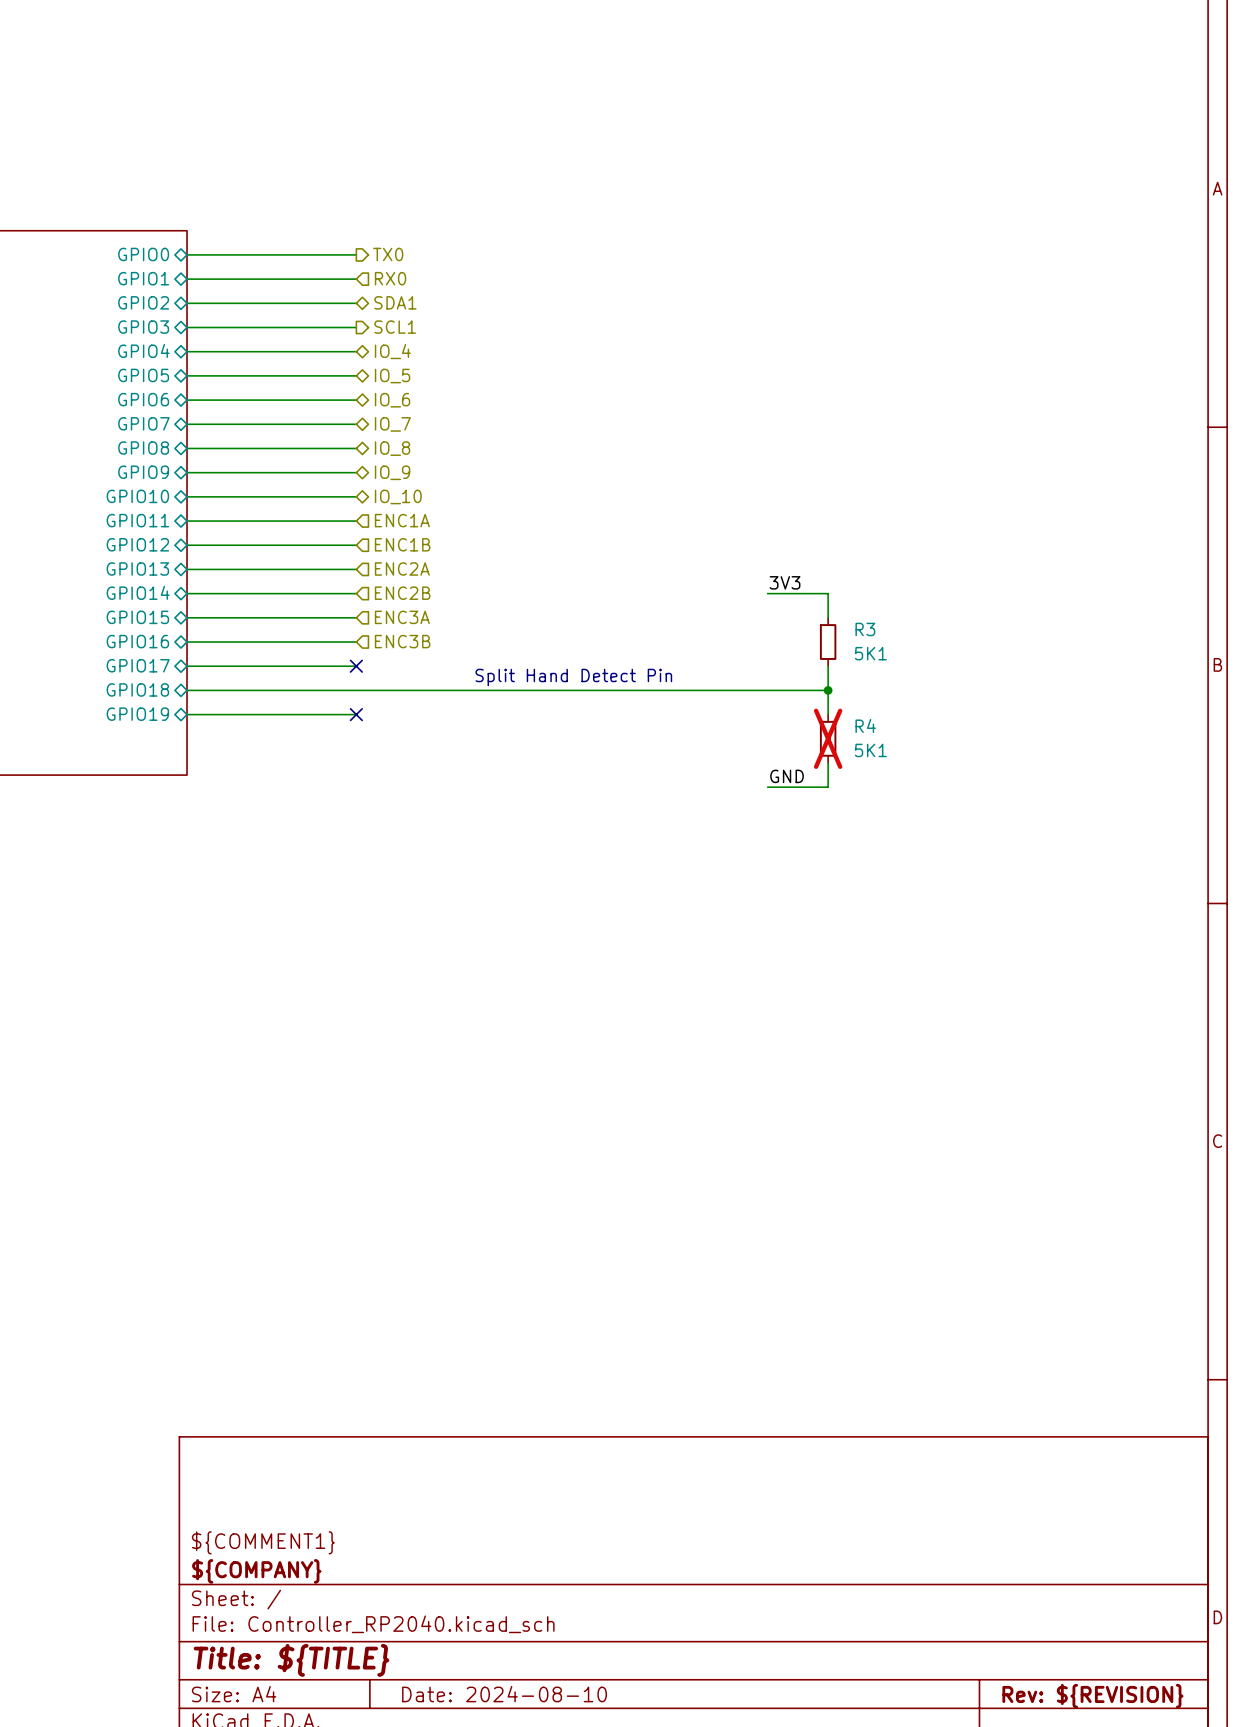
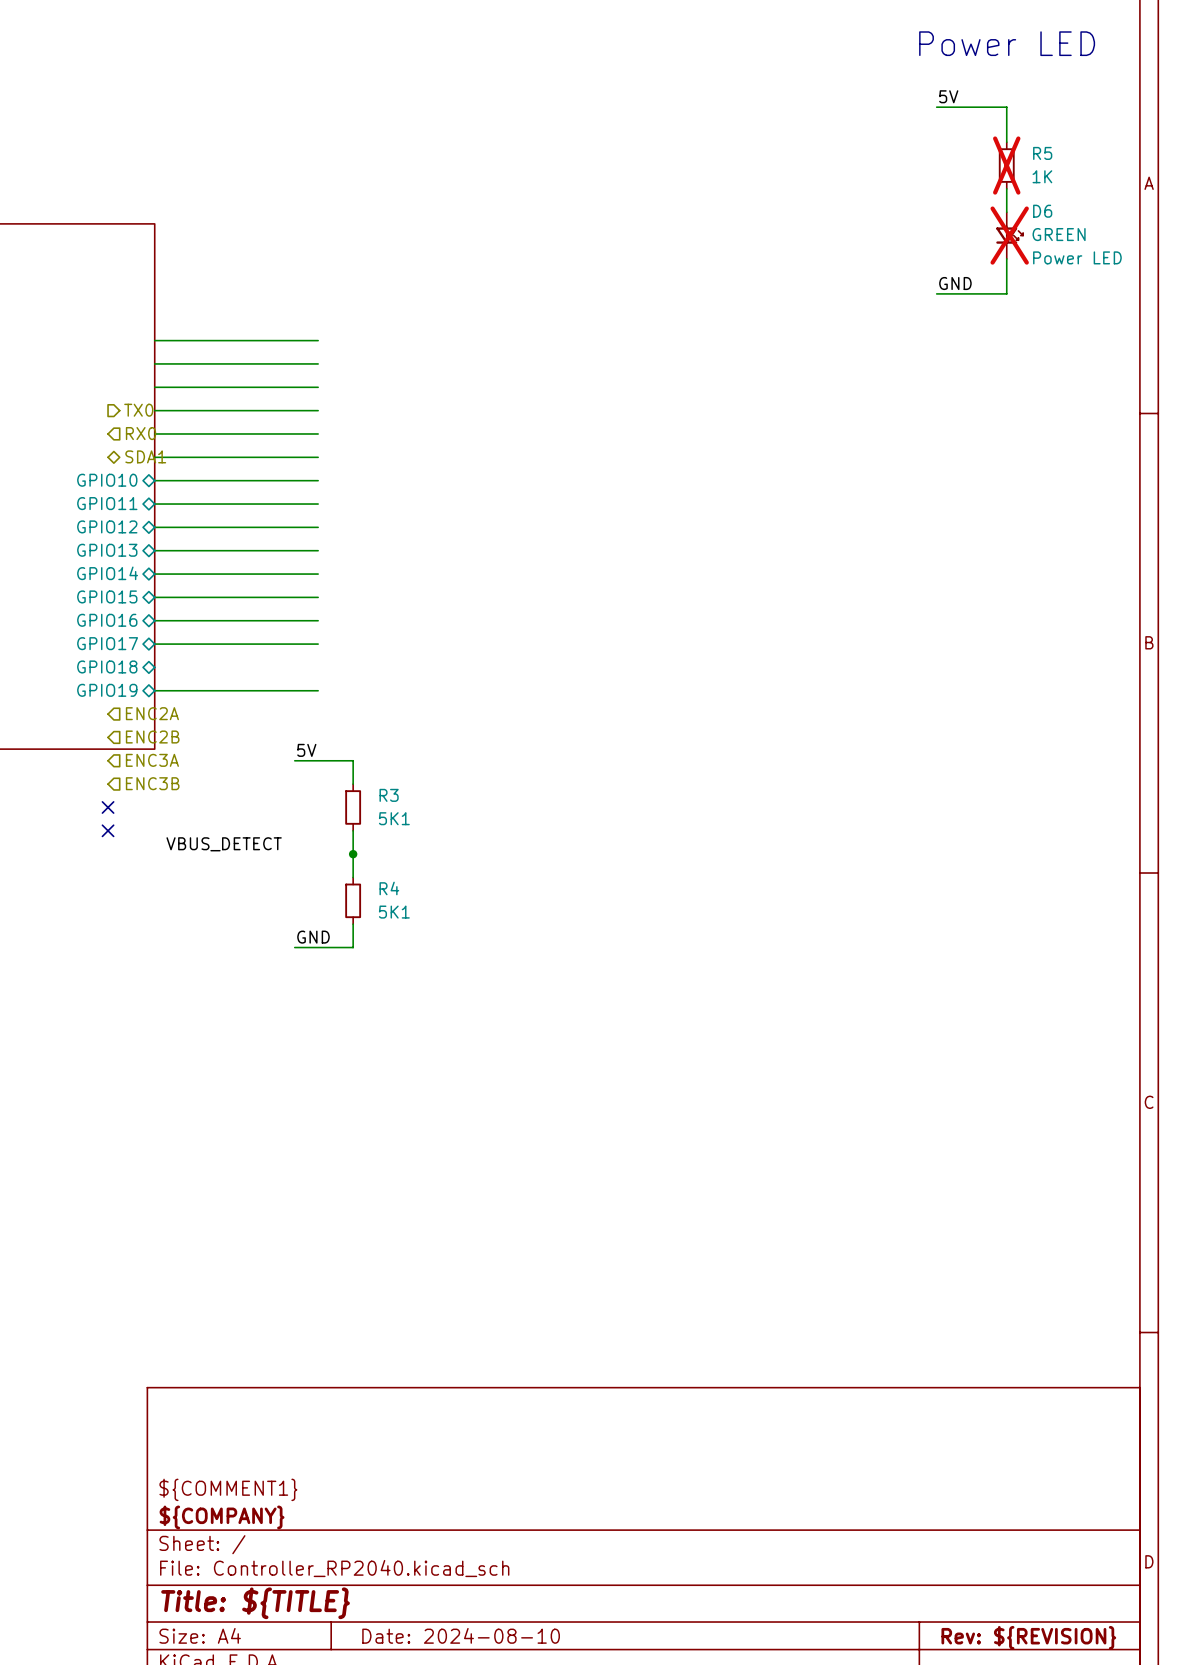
text: none -> Power LED (1007, 43)
label: none -> 5V (948, 96)
wire: none -> (936, 107) (1006, 107) (1006, 142)
R5: none -> 1K (1006, 165)
wire: none -> (1006, 188) (1006, 212)
D6: none -> GREEN (1009, 235)
sheet pin: GPIO0 (143, 254) -> none
wire: (187, 254) (356, 254) -> none
hierarchical label: TX0 (388, 254) -> none
wire: none -> (1006, 258) (1006, 293) (936, 293)
sheet pin: GPIO1 (143, 278) -> none
hierarchical label: RX0 (390, 278) -> none
wire: (187, 279) (356, 279) -> none
label: none -> GND (955, 283)
sheet pin: GPIO2 (143, 302) -> none
hierarchical label: SDA1 (395, 302) -> none
wire: (187, 303) (356, 303) -> none
sheet pin: GPIO3 (143, 327) -> none
wire: (187, 327) (356, 327) -> none
hierarchical label: SCL1 (395, 327) -> none
sheet pin: GPIO4 (143, 350) -> none
hierarchical label: IO_4 (392, 351) -> none
sheet pin: GPIO5 (143, 375) -> none
hierarchical label: IO_5 (392, 376) -> none
sheet pin: GPIO6 (143, 399) -> none
hierarchical label: IO_6 (392, 400) -> none
sheet pin: GPIO7 (143, 423) -> none
hierarchical label: none -> TX0 (138, 410)
hierarchical label: IO_7 (392, 424) -> none
sheet pin: GPIO8 (143, 448) -> none
hierarchical label: none -> RX0 (141, 433)
hierarchical label: IO_8 (392, 448) -> none
sheet pin: GPIO9 (143, 472) -> none
hierarchical label: none -> SDA1 (145, 456)
hierarchical label: IO_9 (392, 472) -> none
hierarchical label: IO_10 (398, 496) -> none
hierarchical label: ENC1A (402, 520) -> none
hierarchical label: ENC1B (402, 544) -> none
hierarchical label: ENC2A (402, 568) -> none
label: 3V3 (785, 582) -> none
hierarchical label: ENC2B (402, 593) -> none
wire: (767, 593) (828, 593) (828, 617) -> none
hierarchical label: ENC3A (402, 617) -> none
hierarchical label: ENC3B (402, 641) -> none
R3 position: (828, 642) -> (353, 807)
no-connect mark: (356, 666) -> none
wire: (828, 666) (828, 714) -> none
text: Split Hand Detect Pin (573, 677) -> none
wire: (187, 690) (828, 690) -> none
junction: (828, 690) -> none
no-connect mark: (356, 714) -> none
hierarchical label: none -> ENC2A (152, 713)
R4 position: (828, 738) -> (353, 900)
R4 do-not-place cross: (828, 738) -> none
hierarchical label: none -> ENC2B (152, 737)
wire: (828, 762) (828, 787) (767, 787) -> none
label: none -> 5V (306, 750)
label: GND (787, 776) -> none
hierarchical label: none -> ENC3A (152, 760)
wire: none -> (294, 760) (353, 760) (353, 784)
hierarchical label: none -> ENC3B (152, 783)
no-connect mark: none -> (108, 807)
no-connect mark: none -> (108, 830)
wire: none -> (353, 830) (353, 877)
label: none -> VBUS_DETECT (224, 844)
junction: none -> (353, 854)
wire: none -> (353, 924) (353, 947) (294, 947)
label: none -> GND (313, 937)

